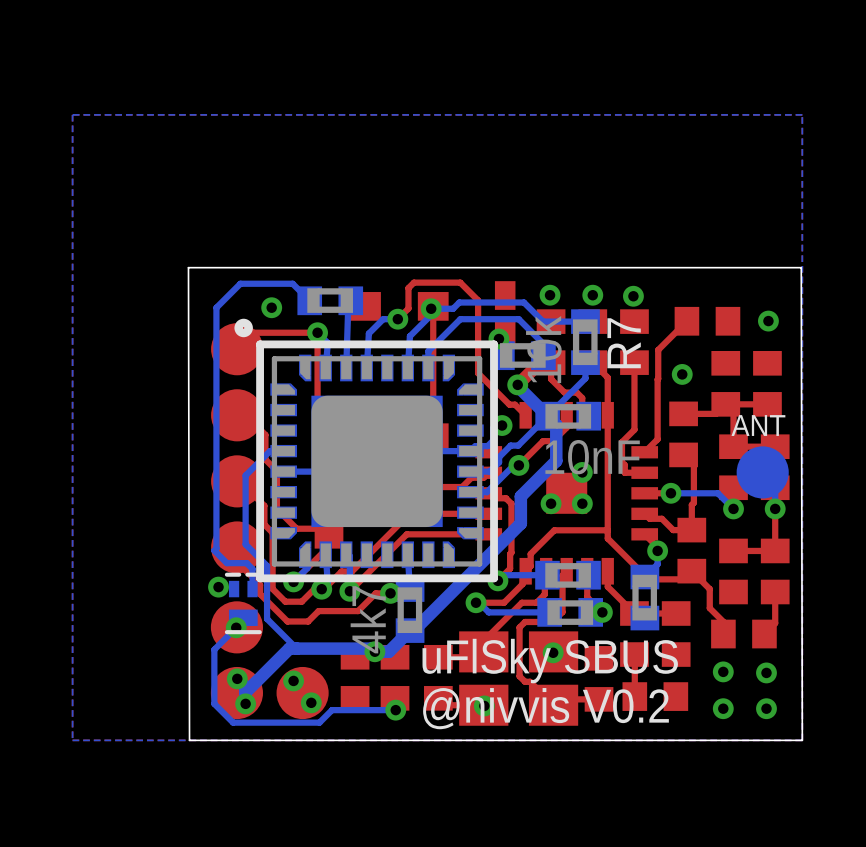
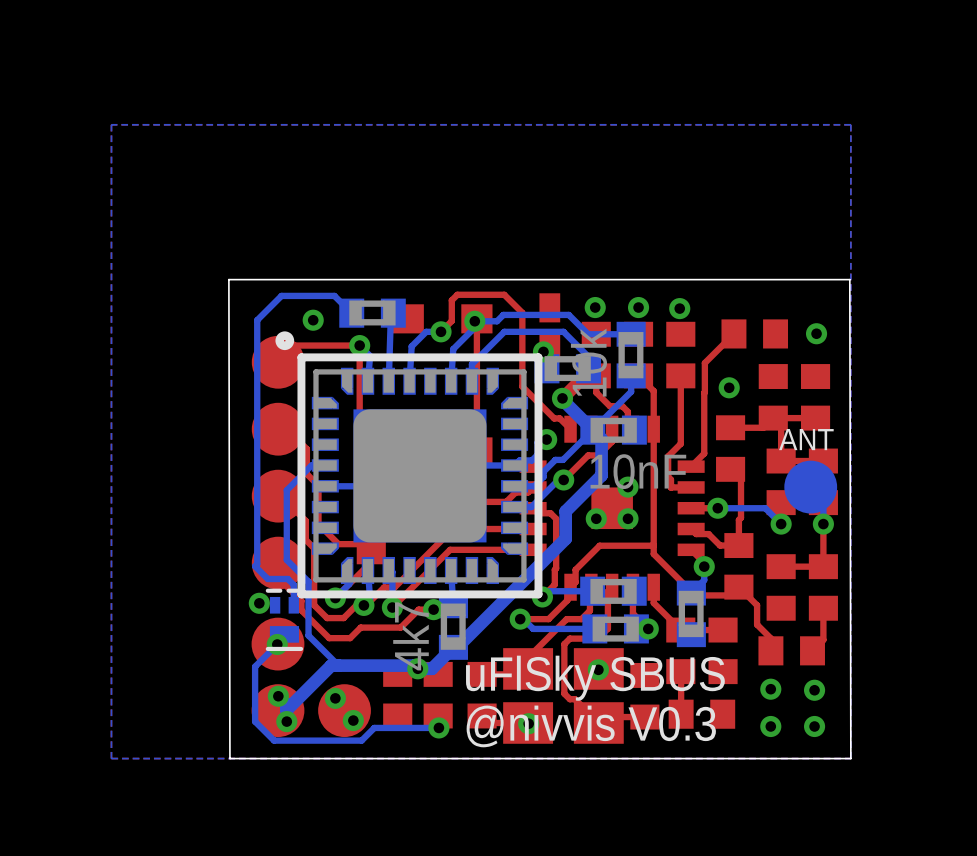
R7 name: R7 (624, 343) -> none
text: @nivvis V0.2 (545, 708) -> @nivvis V0.3 (591, 726)

